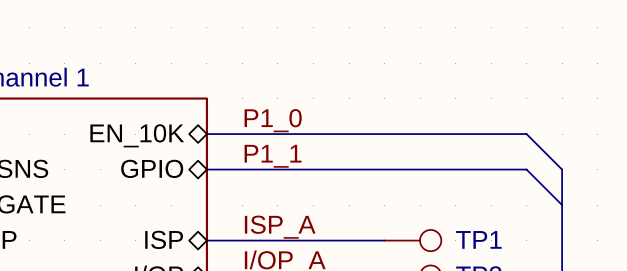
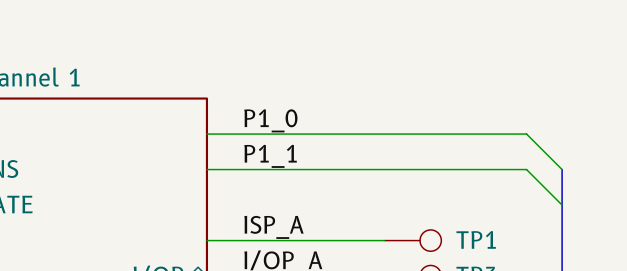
sheet pin: EN_10K (137, 135) -> none
sheet pin: GPIO (152, 168) -> none
sheet pin: ISP (164, 239) -> none

